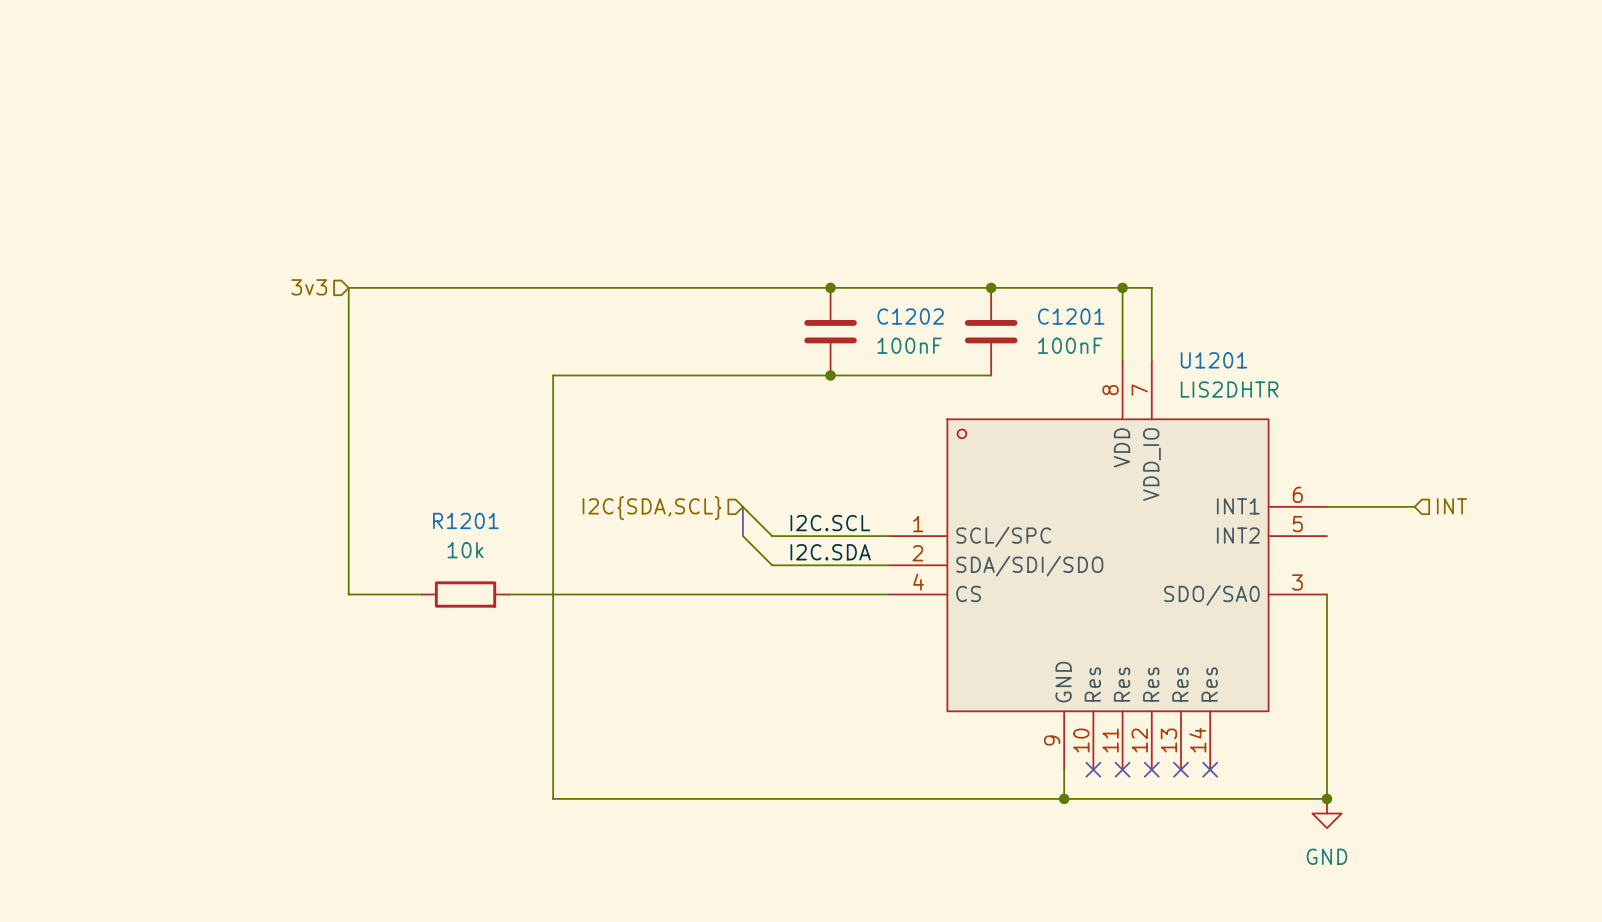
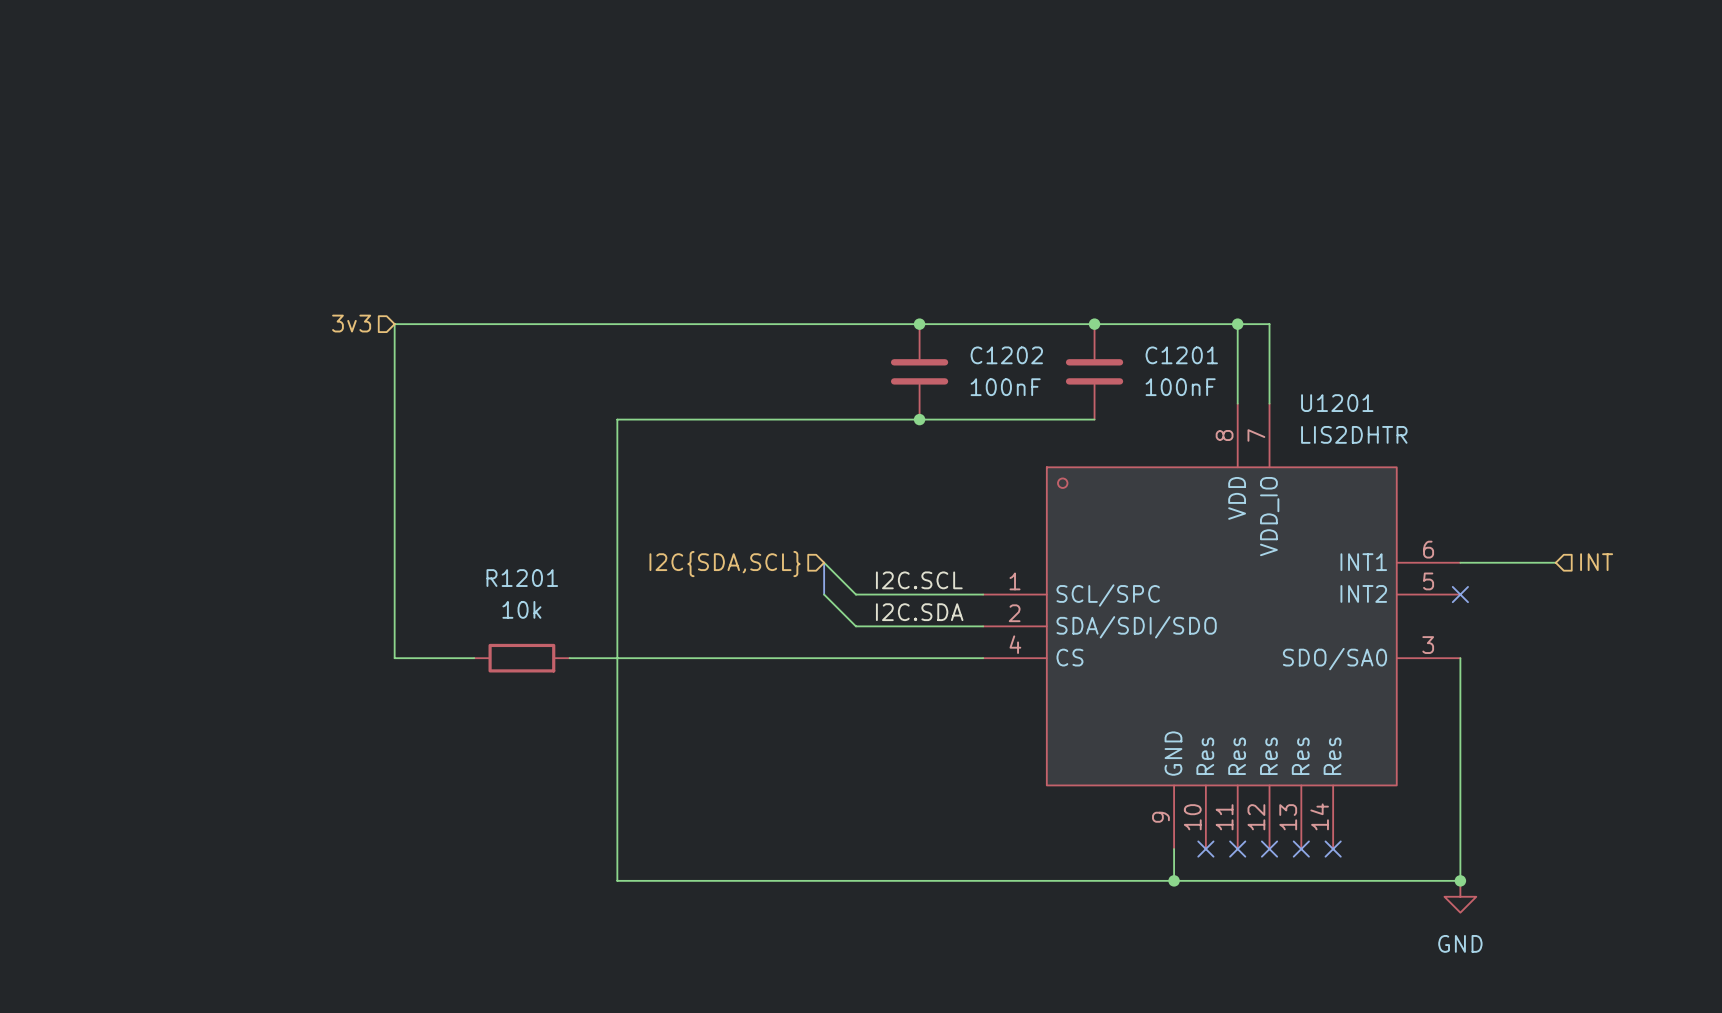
no-connect mark: none -> (1460, 594)

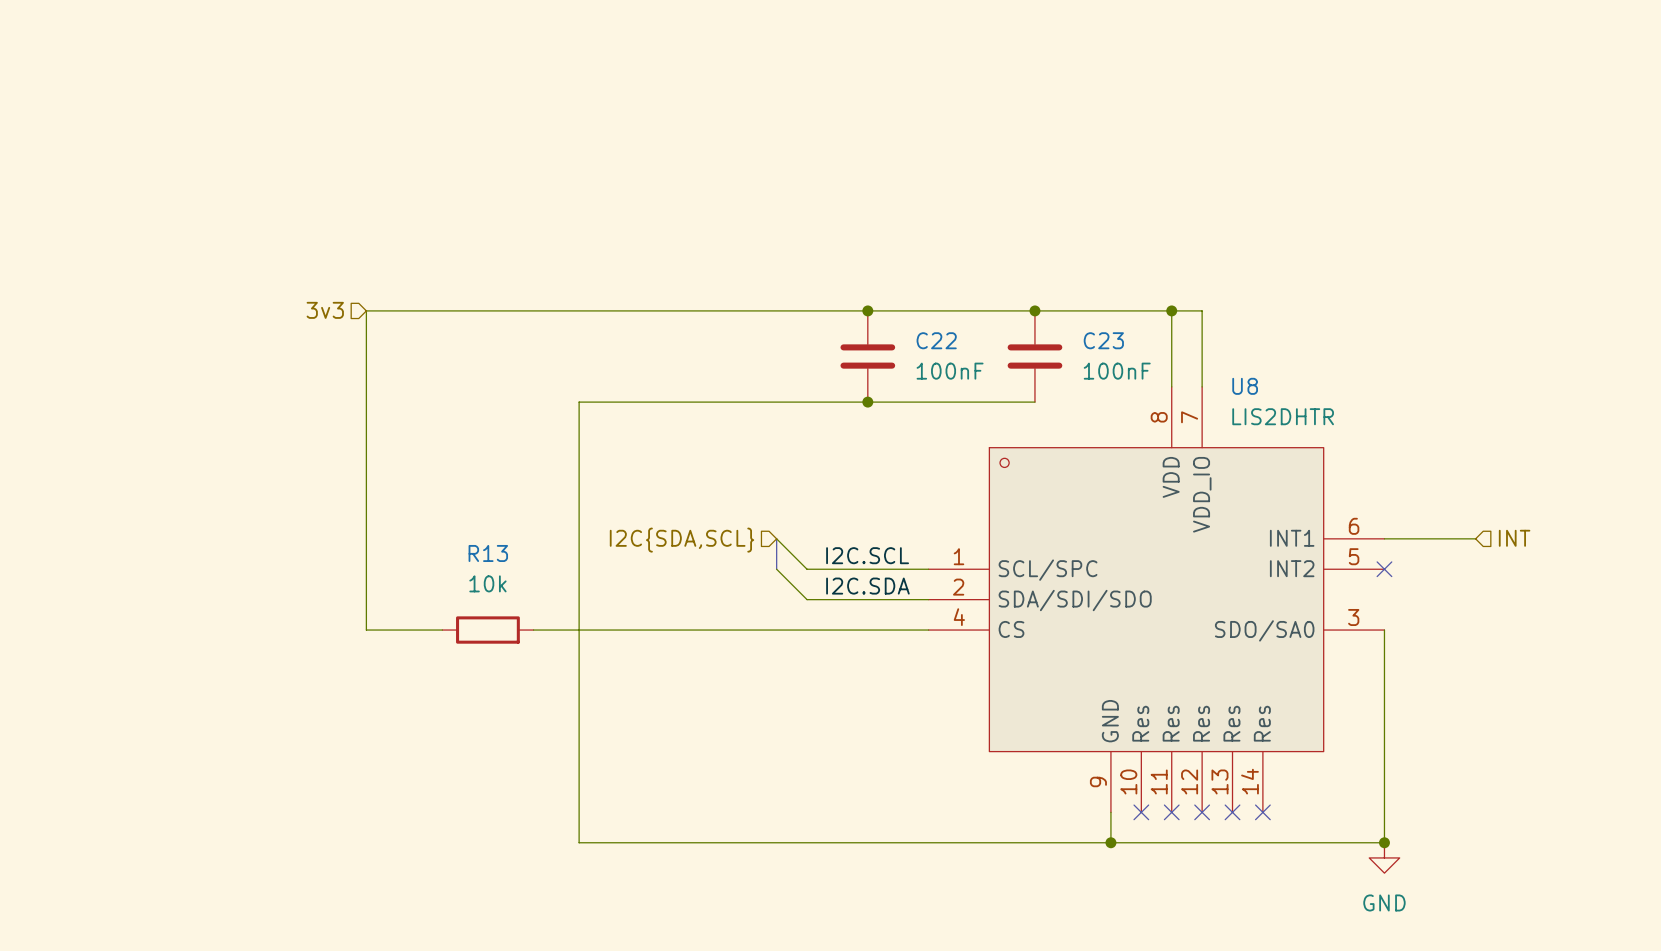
C1202 name: C1202 (1006, 355) -> C22 (936, 340)
C1201 name: C1201 (1181, 355) -> C23 (1103, 340)
U1201 name: U1201 (1337, 403) -> U8 (1245, 386)
R1201 name: R1201 (522, 578) -> R13 (488, 553)

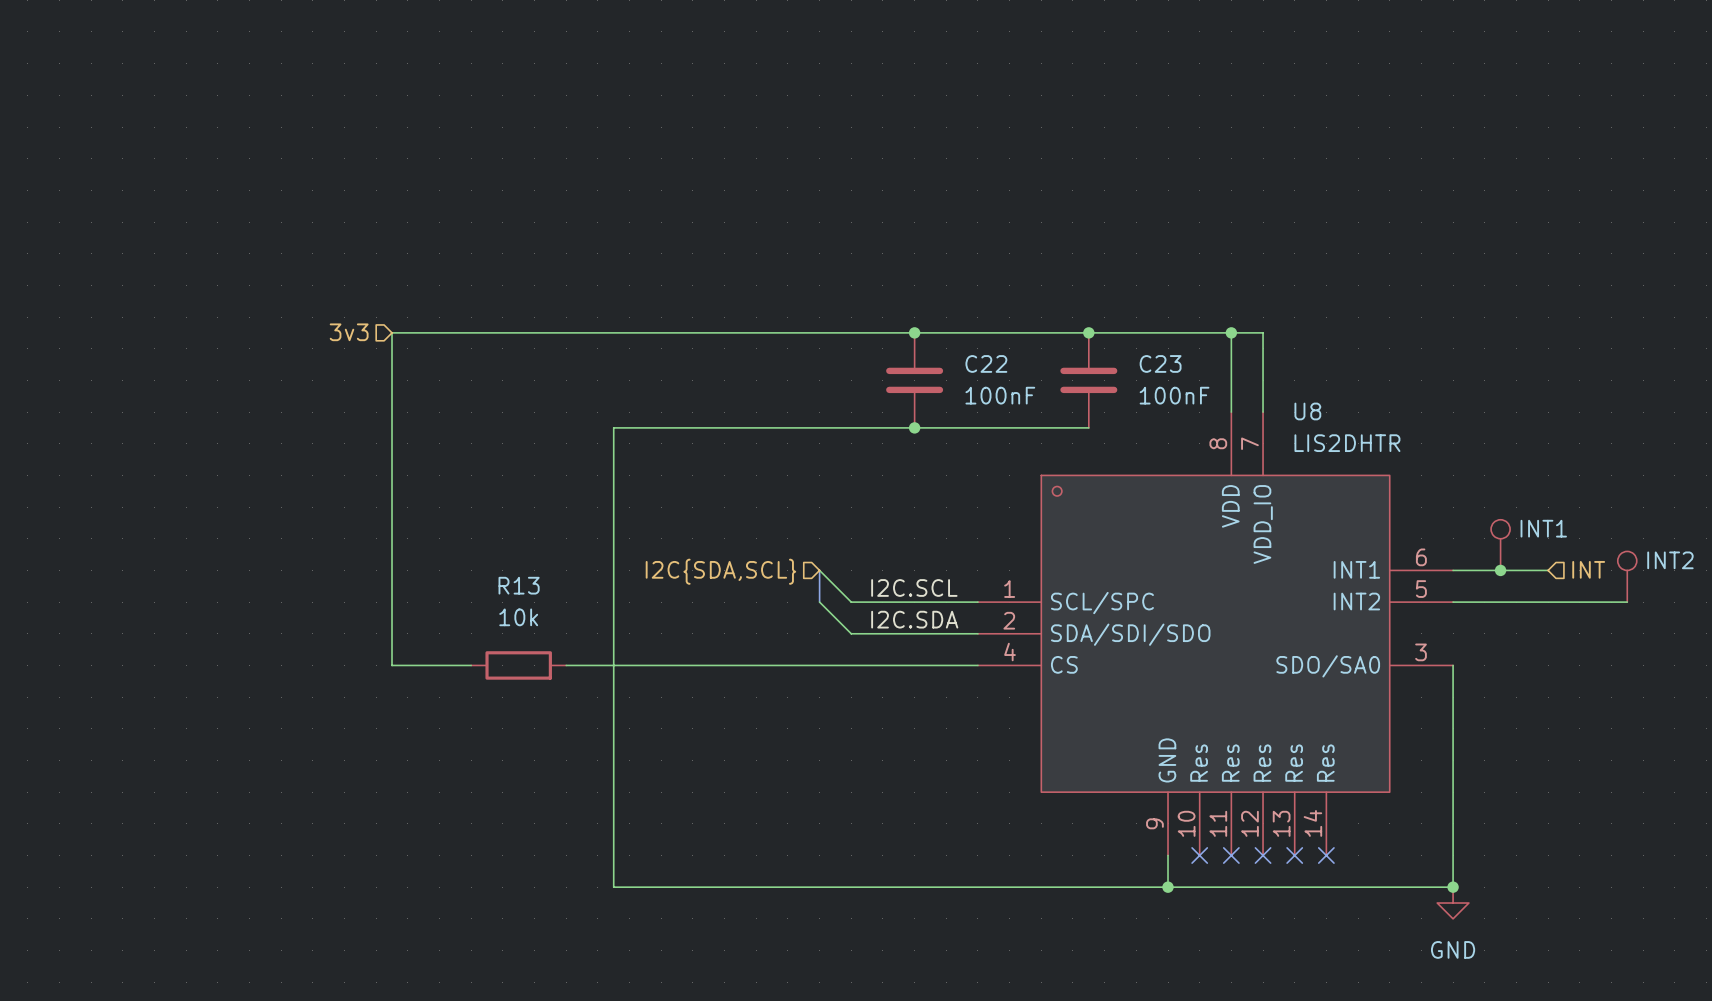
part: none -> (1500, 545)
junction: none -> (1500, 570)
part: none -> (1627, 576)
wire: none -> (1453, 602) (1627, 602)
no-connect mark: (1384, 569) -> none

